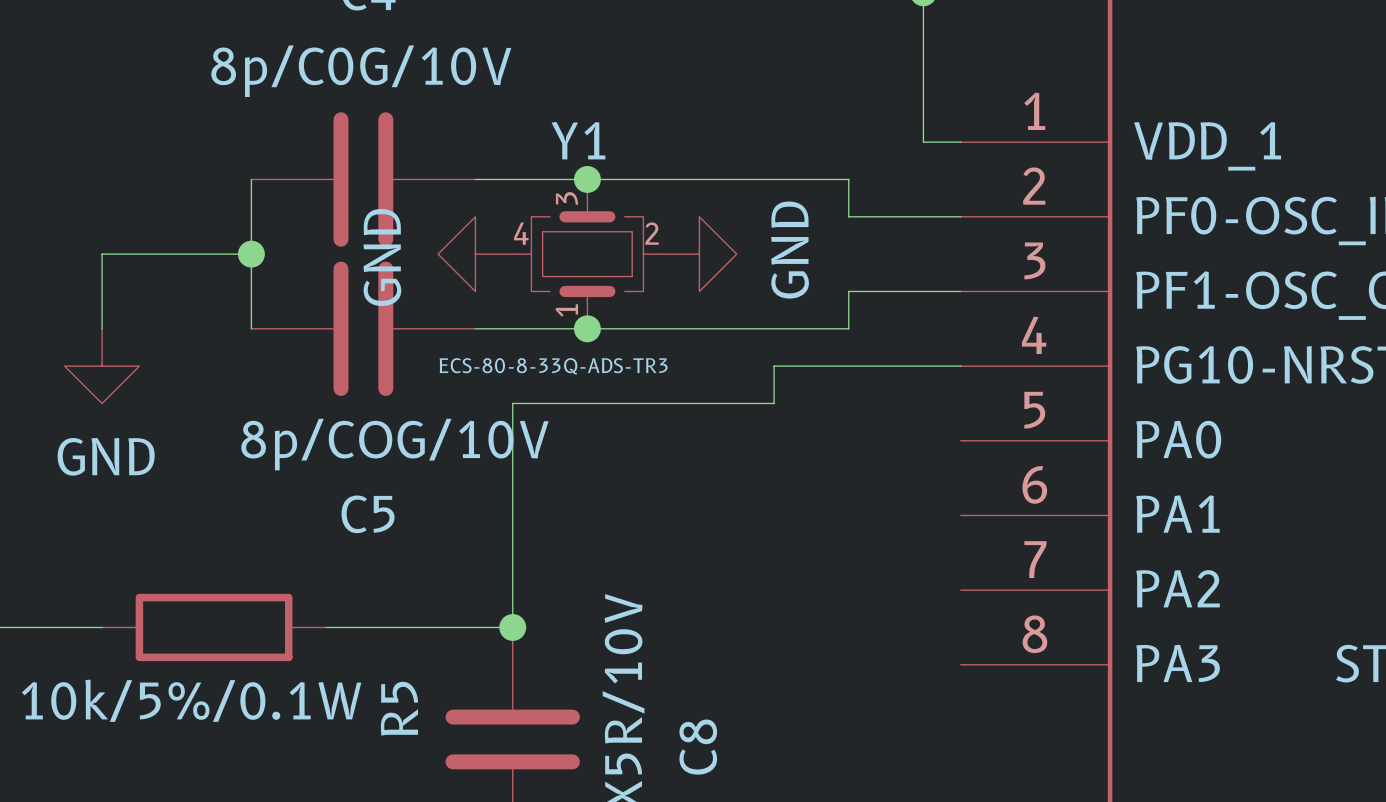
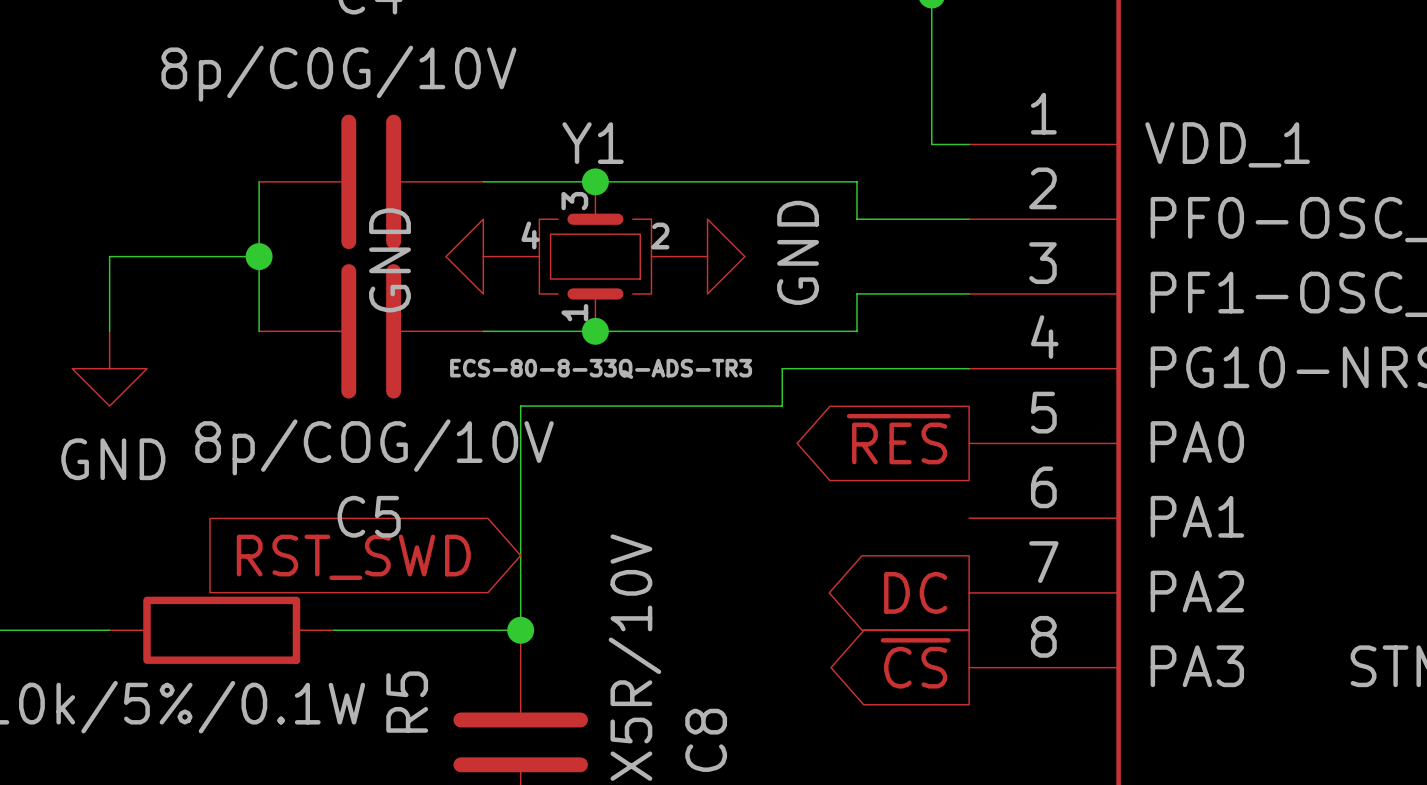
global label: none -> ~{RES} (898, 439)
global label: none -> RST_SWD (353, 557)
global label: none -> DC (915, 592)
global label: none -> ~{CS} (915, 663)

